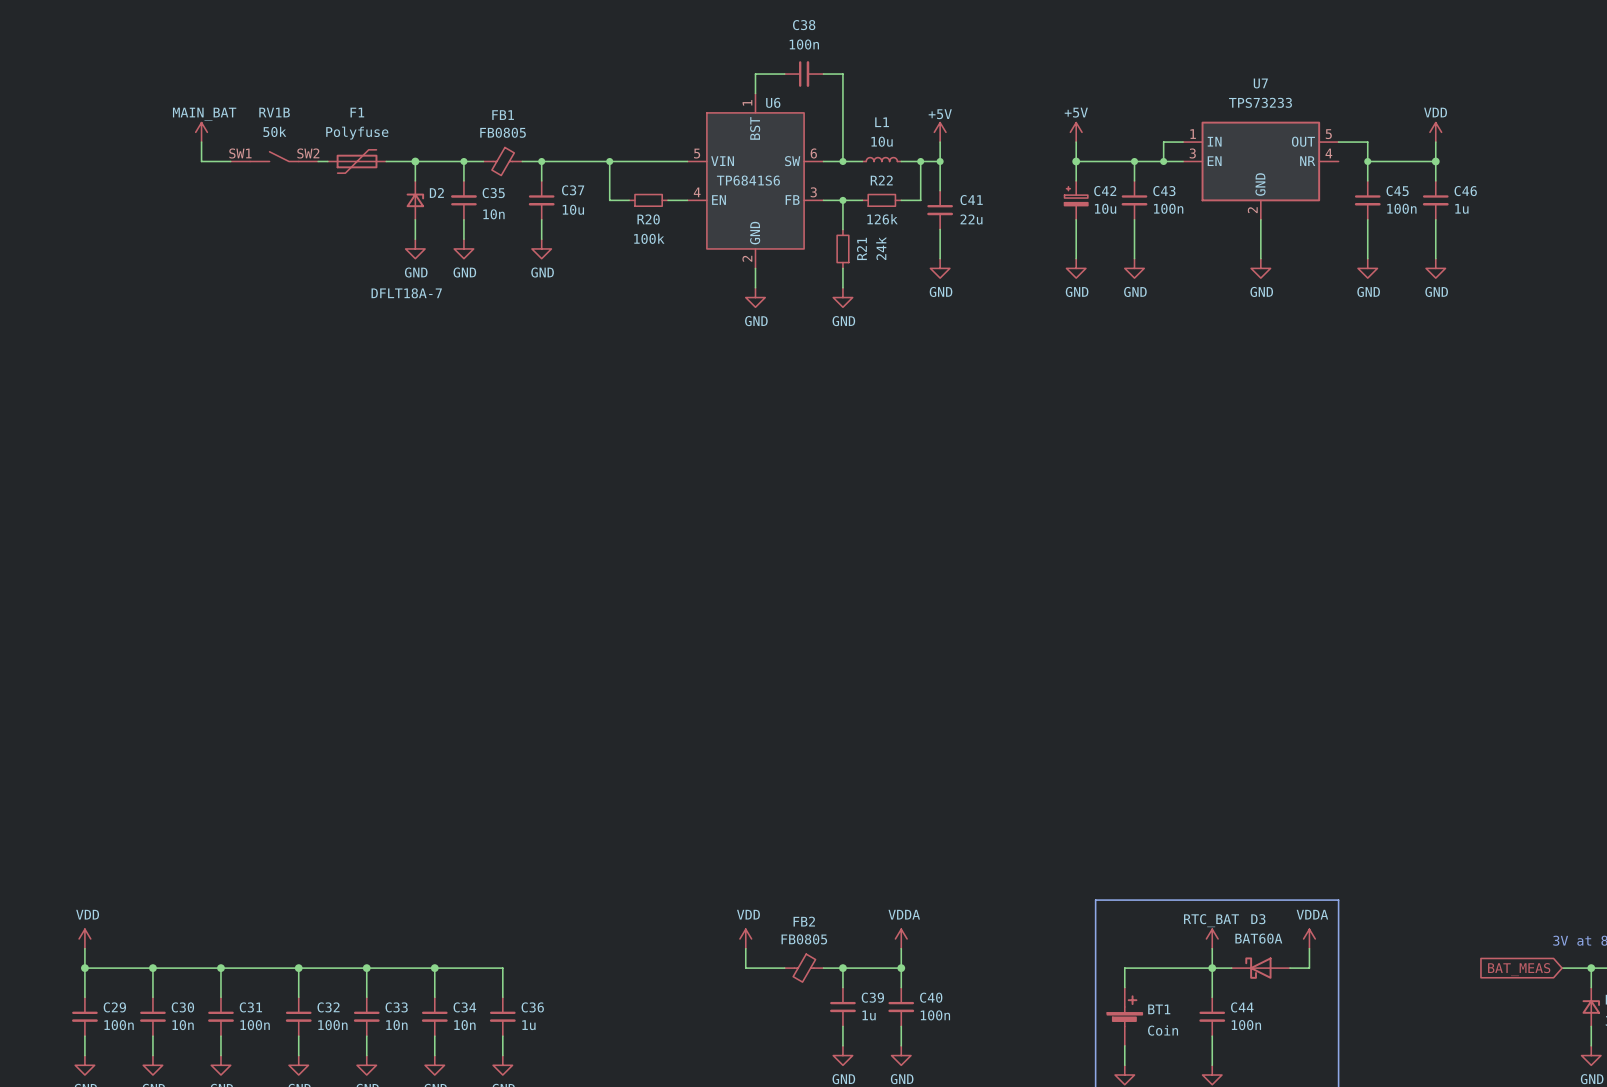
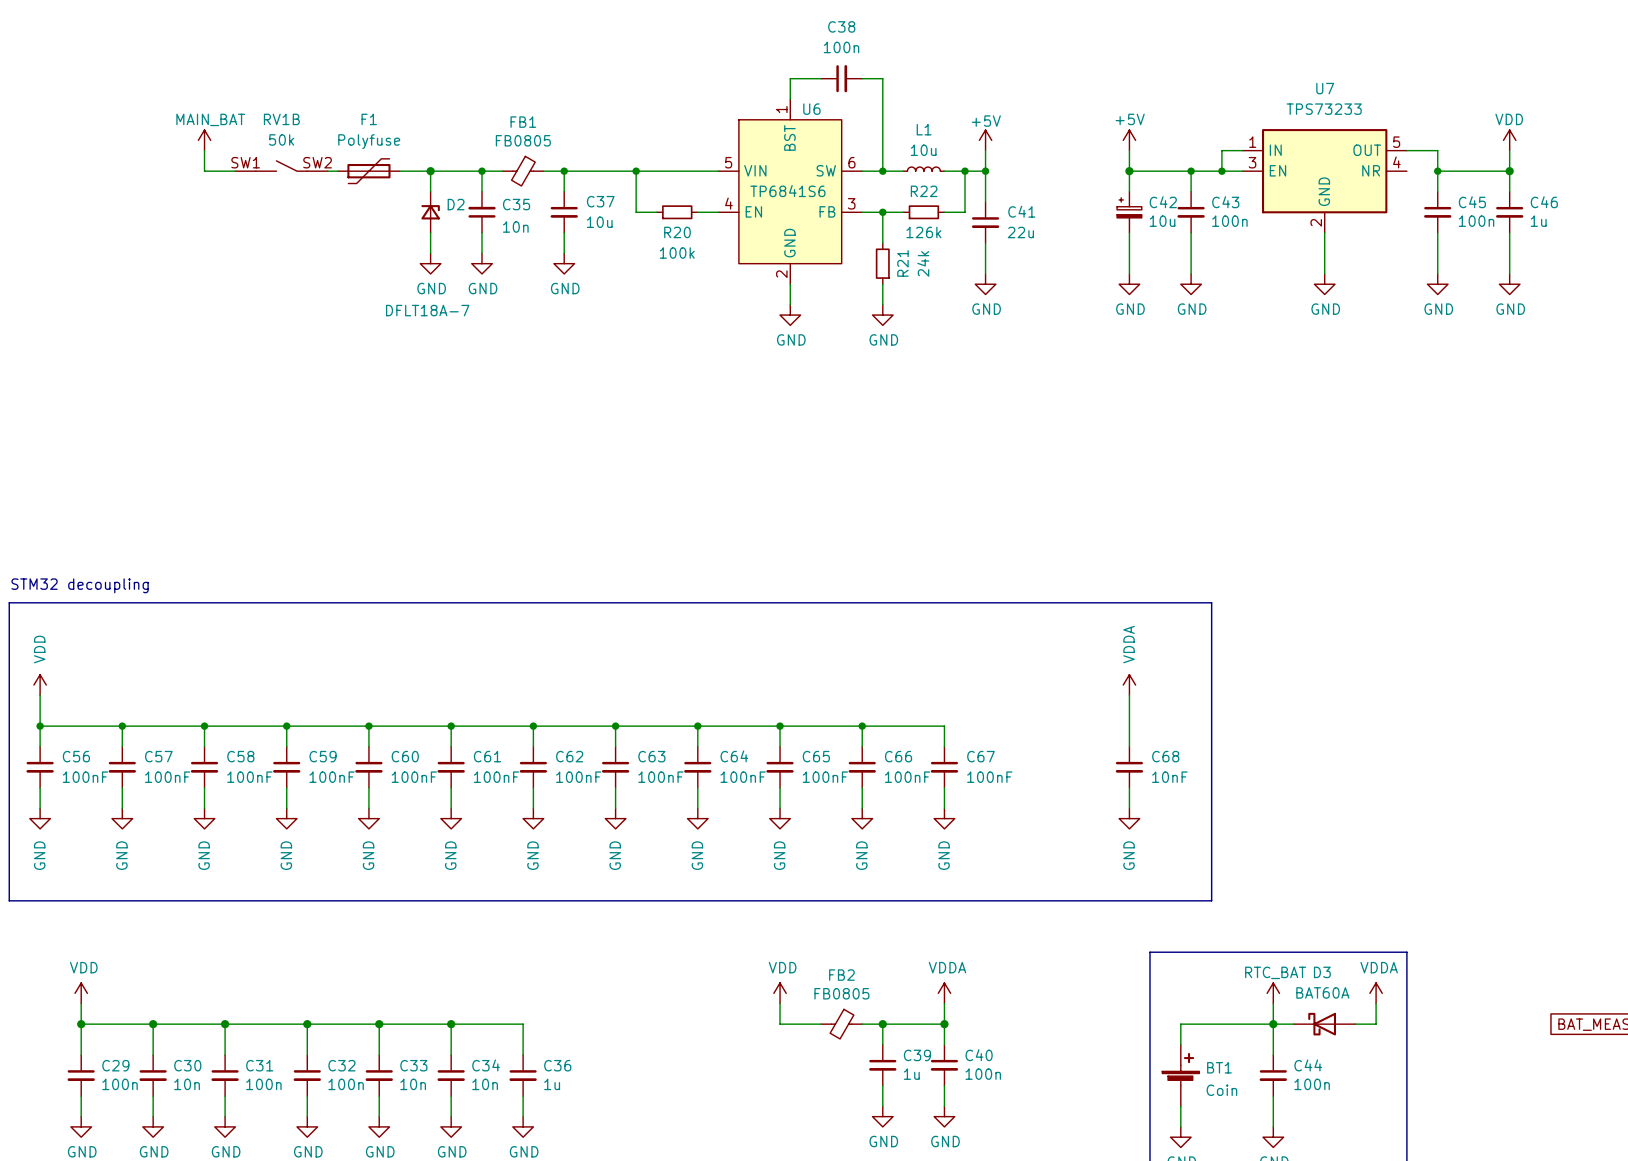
text: none -> STM32 decoupling (80, 585)
line: none -> (9, 602) (1211, 602) (1211, 900) (9, 900) (9, 602)
power symbol: none -> VDD (40, 685)
power symbol: none -> VDDA (1129, 685)
wire: none -> (40, 695) (40, 746)
wire: none -> (1129, 695) (1129, 746)
wire: none -> (40, 726) (944, 726) (944, 746)
junction: none -> (40, 726)
wire: none -> (122, 726) (122, 746)
junction: none -> (122, 726)
wire: none -> (204, 726) (204, 746)
junction: none -> (204, 726)
wire: none -> (286, 726) (286, 746)
junction: none -> (286, 726)
wire: none -> (368, 726) (368, 746)
junction: none -> (368, 726)
wire: none -> (451, 726) (451, 746)
junction: none -> (451, 726)
wire: none -> (533, 726) (533, 746)
junction: none -> (533, 726)
wire: none -> (615, 726) (615, 746)
junction: none -> (615, 726)
wire: none -> (697, 726) (697, 746)
junction: none -> (697, 726)
wire: none -> (780, 726) (780, 746)
junction: none -> (780, 726)
wire: none -> (862, 726) (862, 746)
junction: none -> (862, 726)
C56: none -> 100nF (40, 767)
C57: none -> 100nF (122, 767)
C58: none -> 100nF (204, 767)
C59: none -> 100nF (286, 767)
C60: none -> 100nF (368, 767)
C61: none -> 100nF (451, 767)
C62: none -> 100nF (533, 767)
C63: none -> 100nF (615, 767)
C64: none -> 100nF (697, 767)
C65: none -> 100nF (780, 767)
C66: none -> 100nF (862, 767)
C67: none -> 100nF (944, 767)
C68: none -> 10nF (1129, 767)
wire: none -> (40, 787) (40, 808)
wire: none -> (122, 787) (122, 808)
wire: none -> (204, 787) (204, 808)
wire: none -> (286, 787) (286, 808)
wire: none -> (368, 787) (368, 808)
wire: none -> (451, 787) (451, 808)
wire: none -> (533, 787) (533, 808)
wire: none -> (615, 787) (615, 808)
wire: none -> (697, 787) (697, 808)
wire: none -> (780, 787) (780, 808)
wire: none -> (862, 787) (862, 808)
wire: none -> (944, 787) (944, 808)
wire: none -> (1129, 787) (1129, 808)
power symbol: none -> GND (40, 818)
power symbol: none -> GND (122, 818)
power symbol: none -> GND (204, 818)
power symbol: none -> GND (286, 818)
power symbol: none -> GND (368, 818)
power symbol: none -> GND (451, 818)
power symbol: none -> GND (533, 818)
power symbol: none -> GND (615, 818)
power symbol: none -> GND (697, 818)
power symbol: none -> GND (780, 818)
power symbol: none -> GND (862, 818)
power symbol: none -> GND (944, 818)
power symbol: none -> GND (1129, 818)

